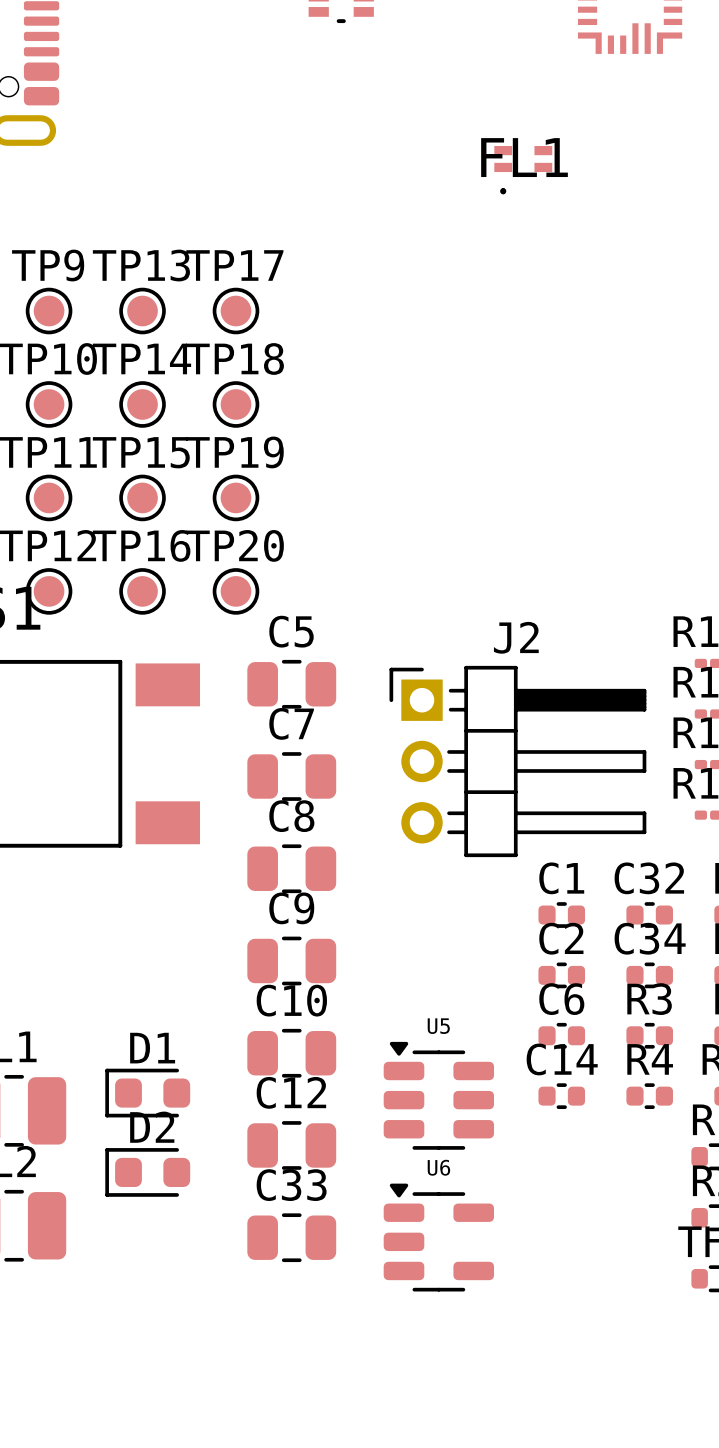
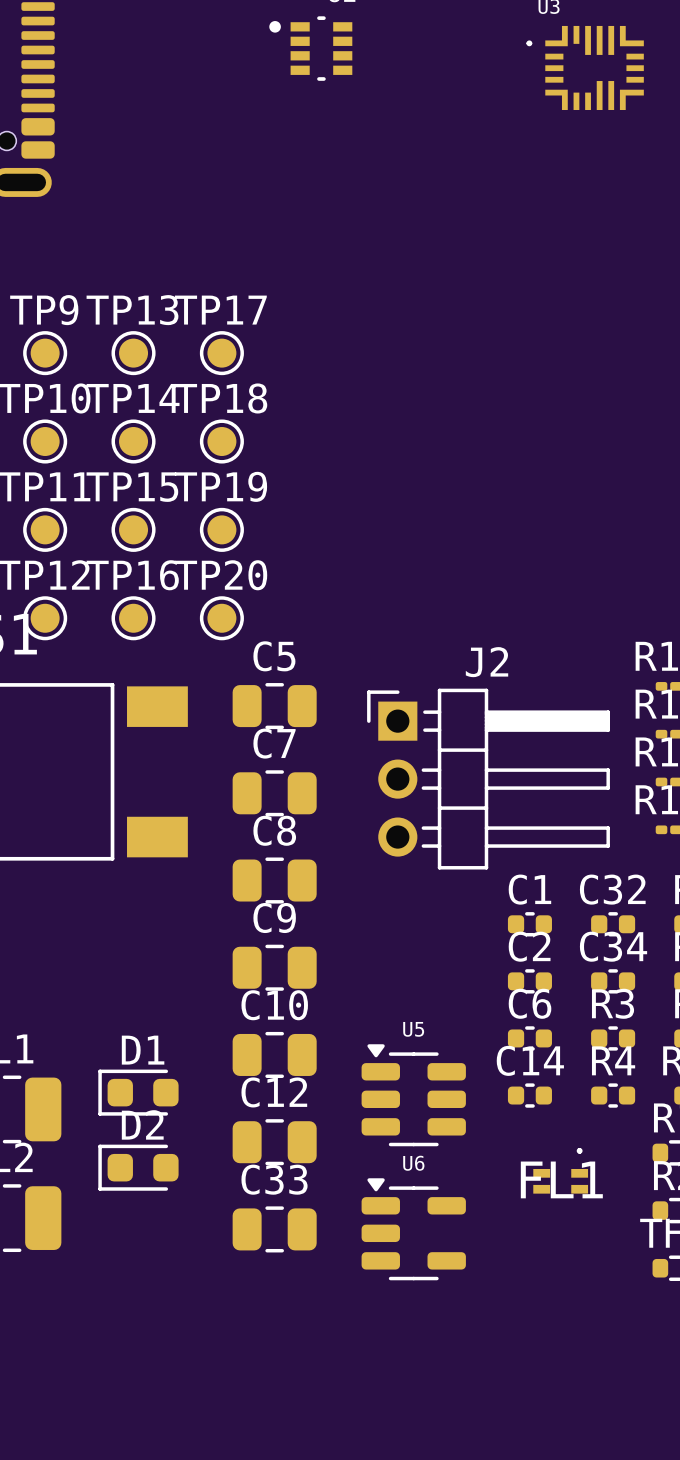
FL1 rotation: 0° (523, 170) -> 180° (560, 1170)
FL1 position: (523, 170) -> (560, 1170)

